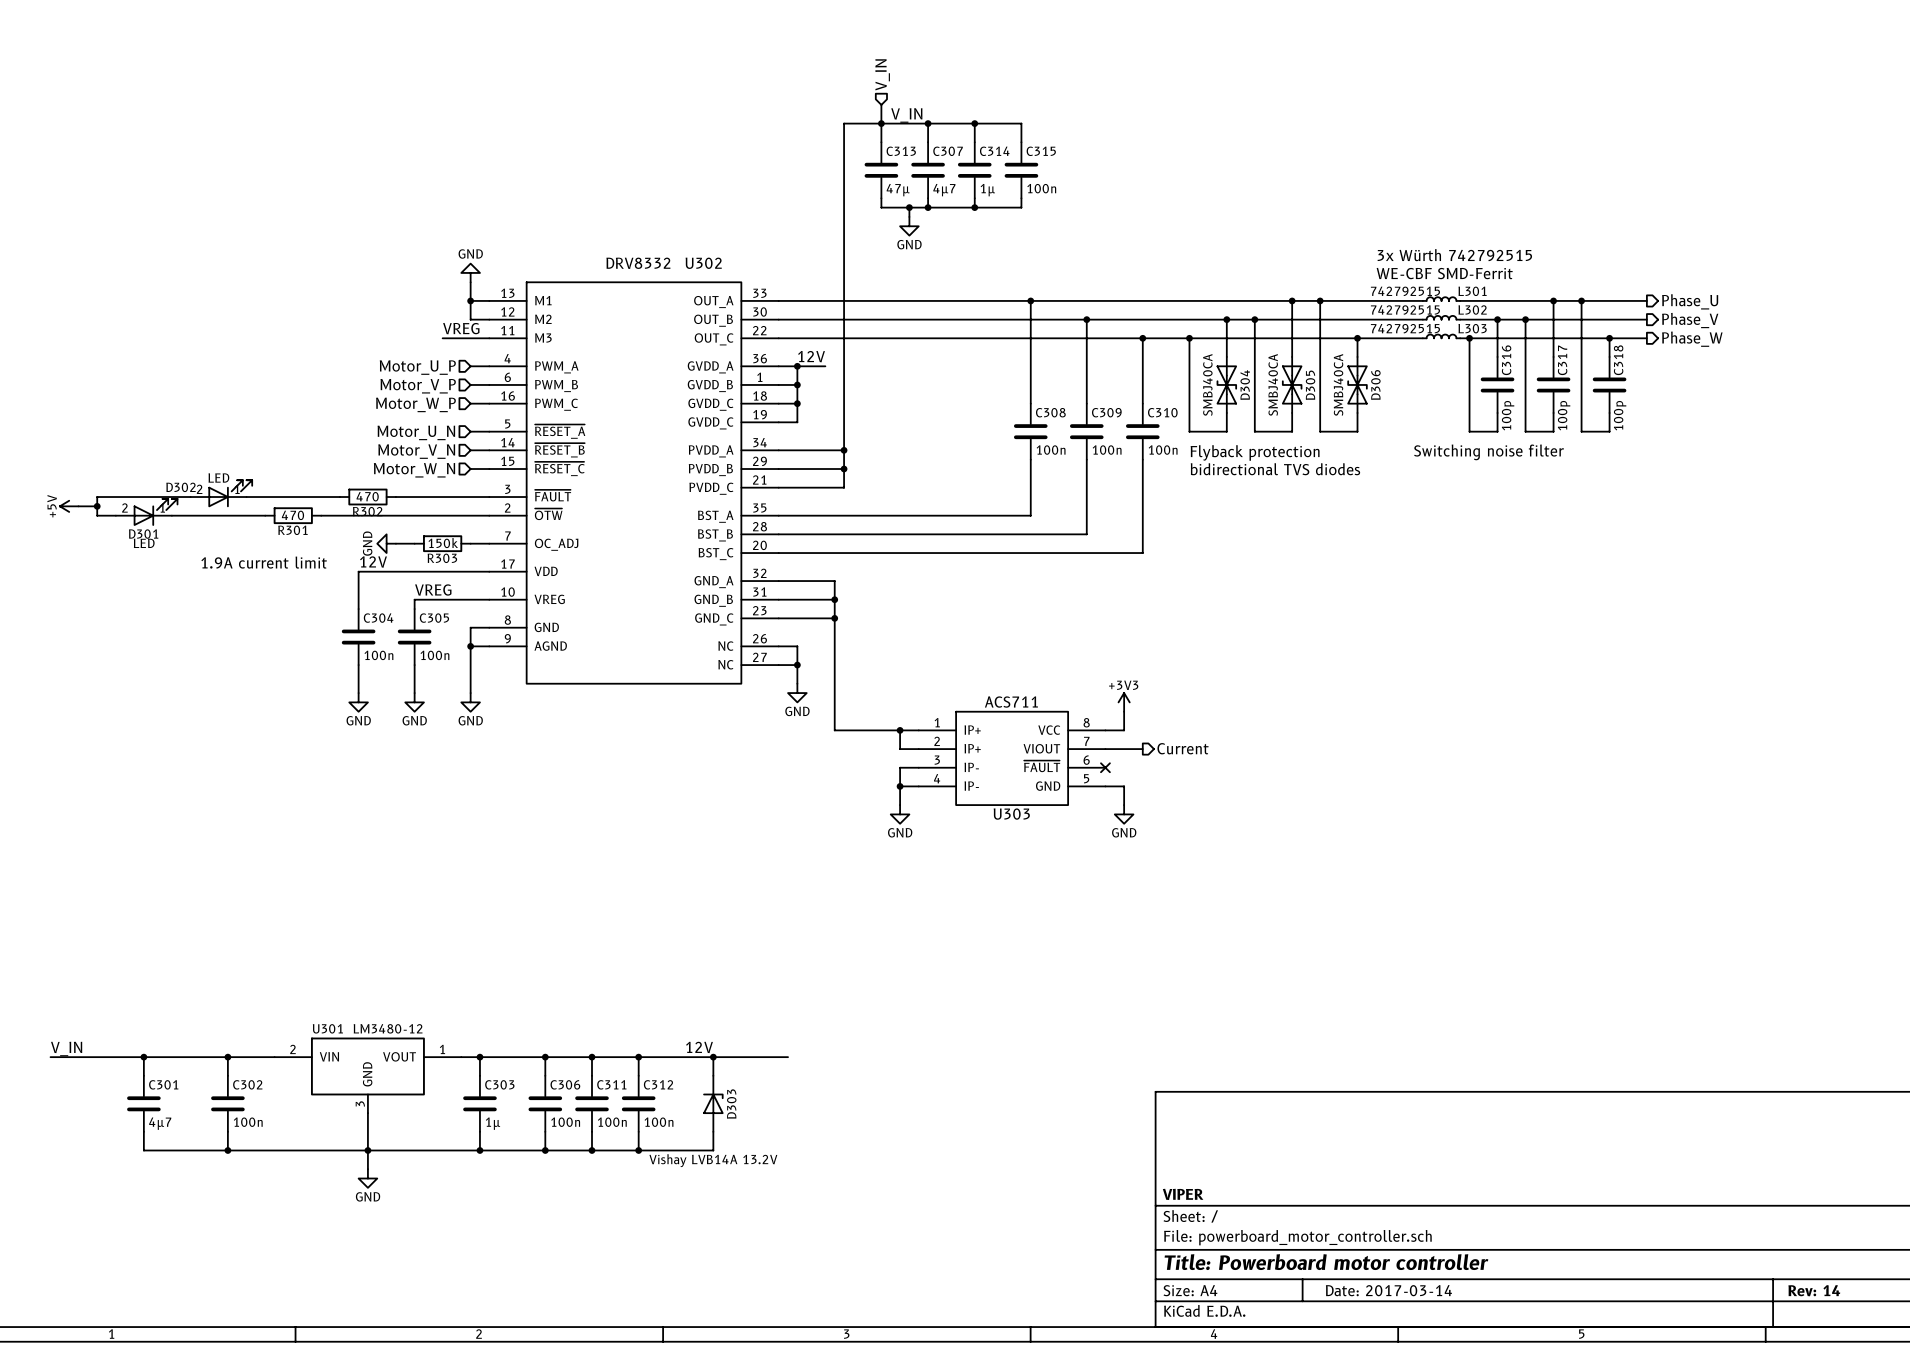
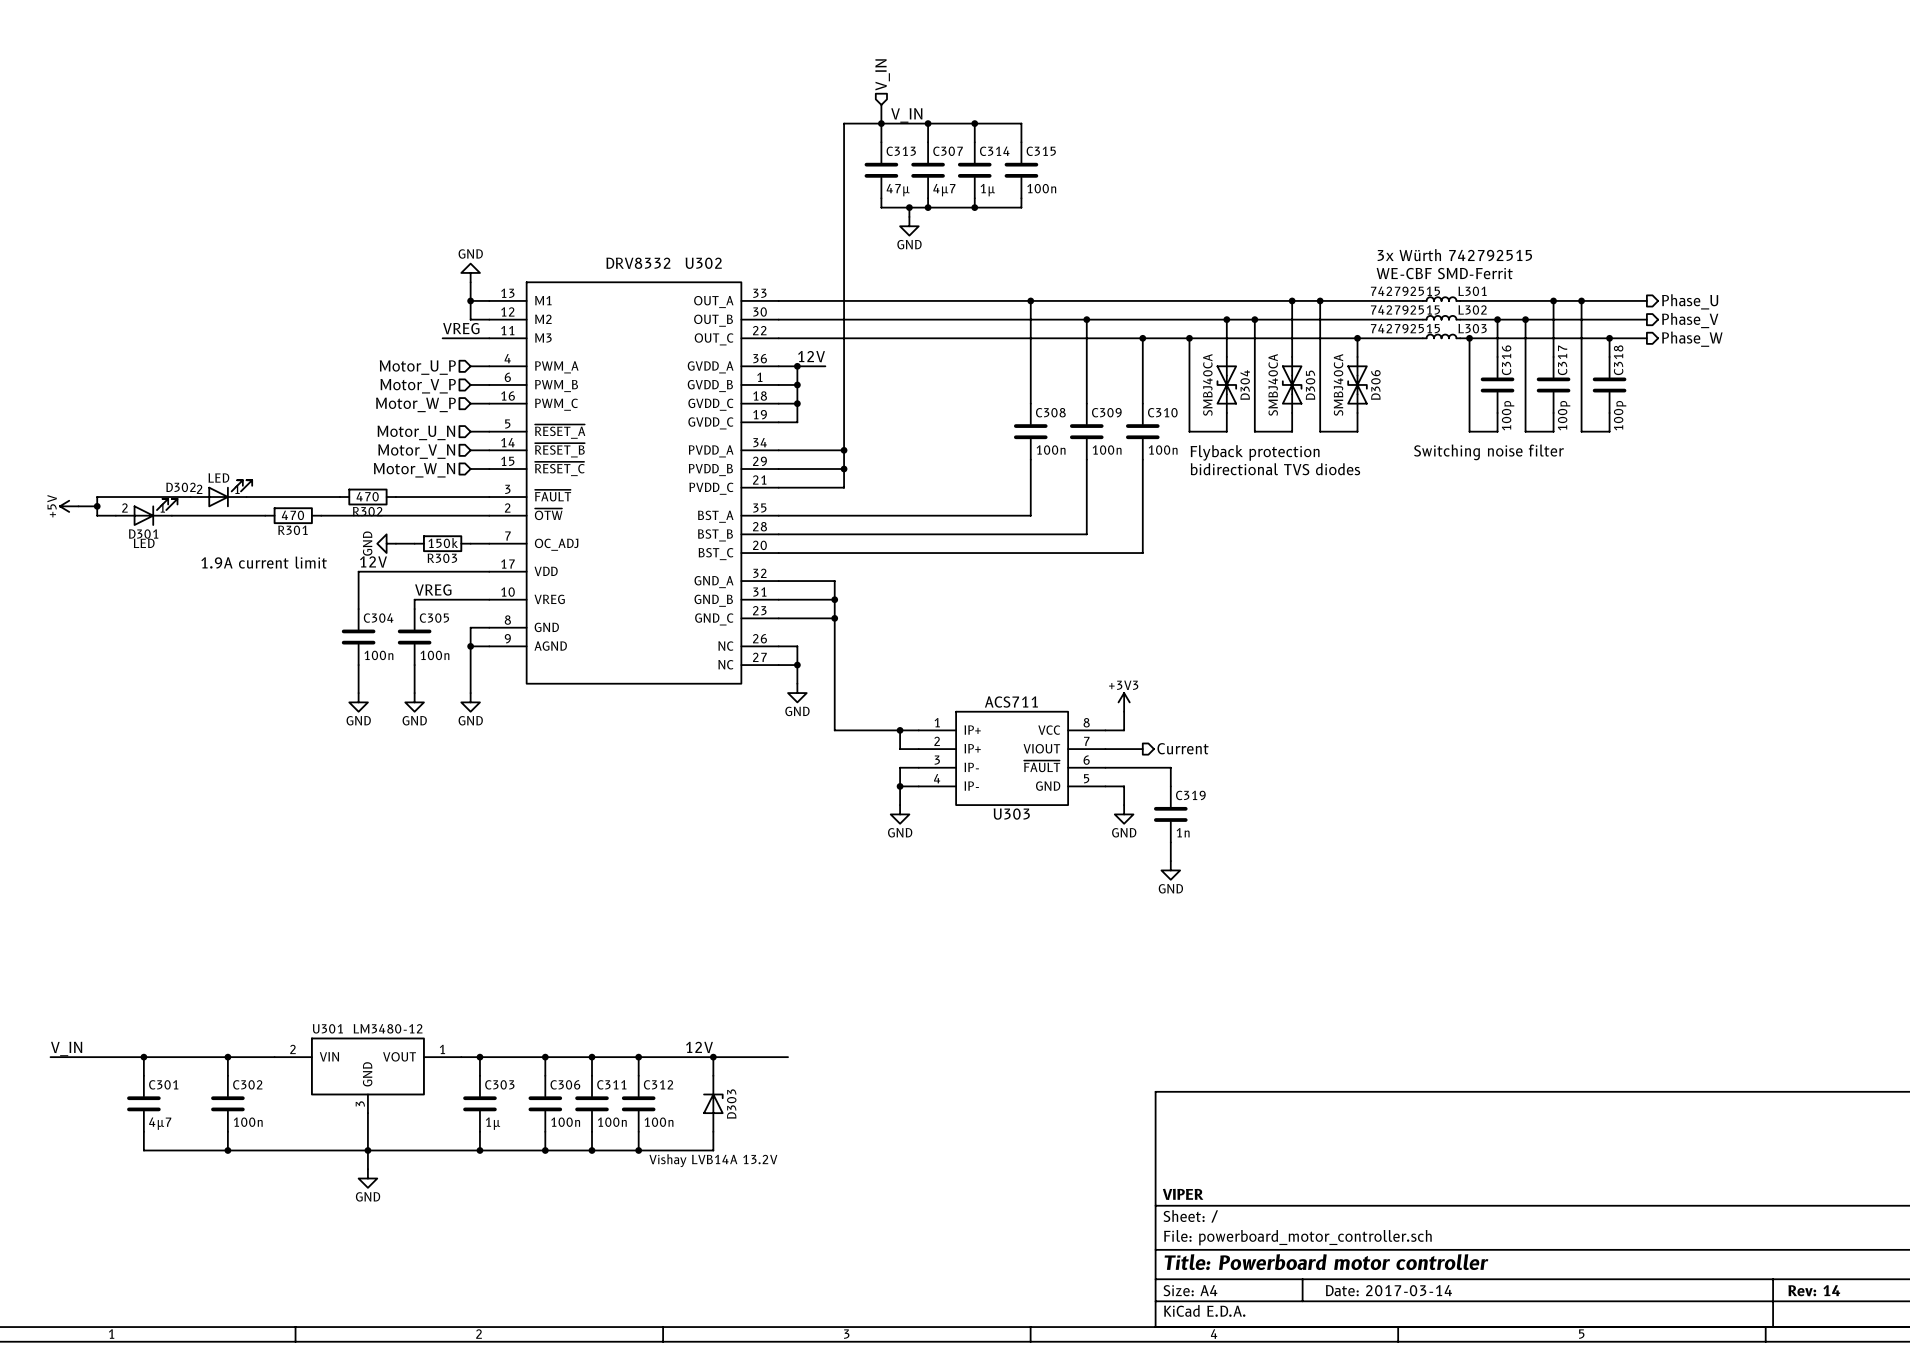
wire: none -> (1105, 767) (1170, 767) (1170, 786)
no-connect mark: (1105, 767) -> none
C319: none -> 1n (1170, 814)
wire: none -> (1170, 842) (1170, 861)
power symbol: none -> GND (1170, 870)

